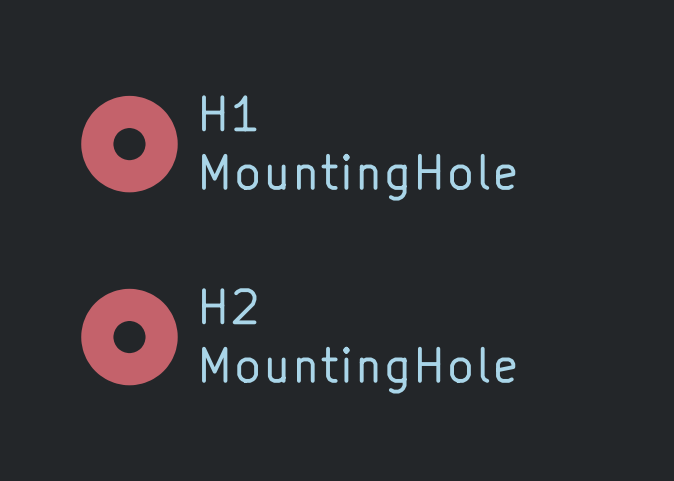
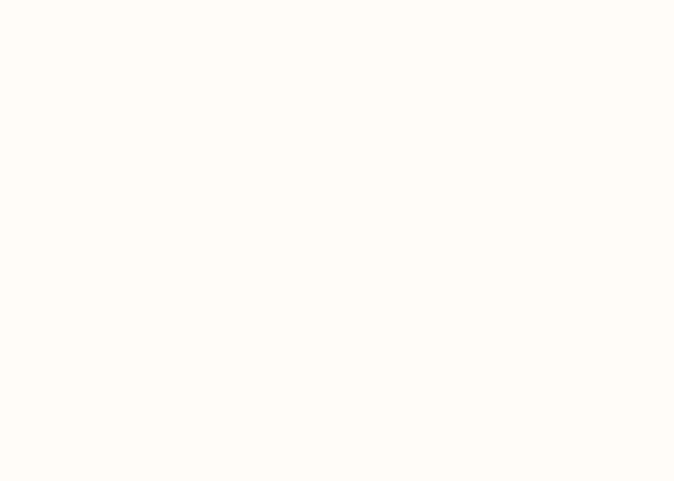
H1: MountingHole (129, 144) -> none
H2: MountingHole (129, 337) -> none

